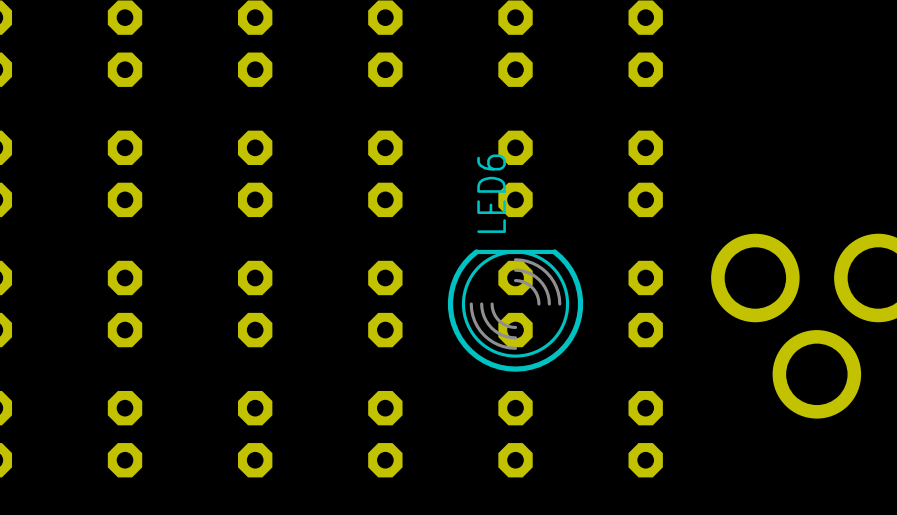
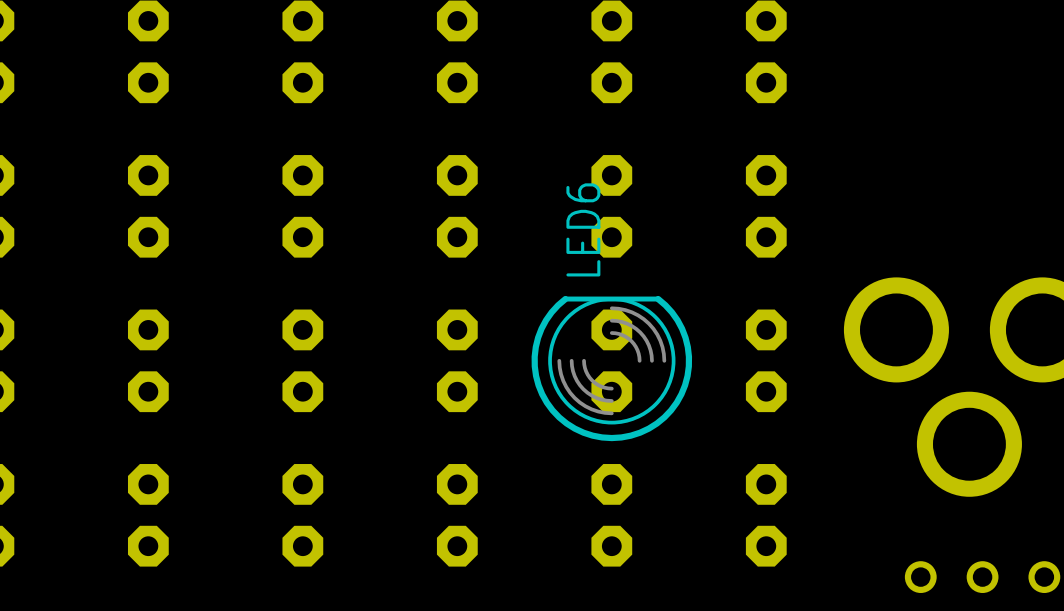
part: none -> (982, 577)

